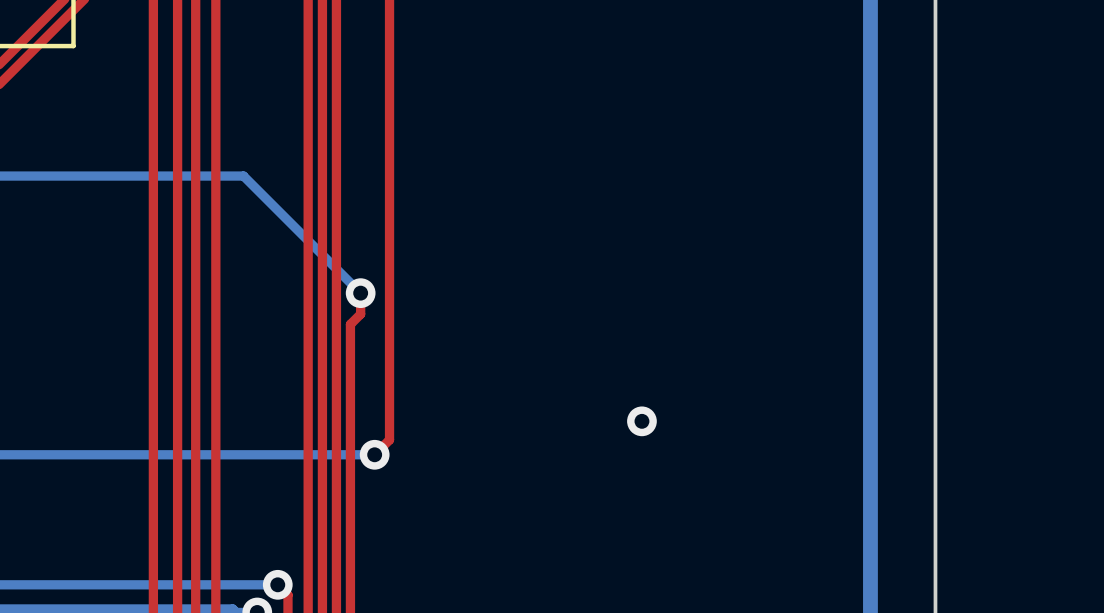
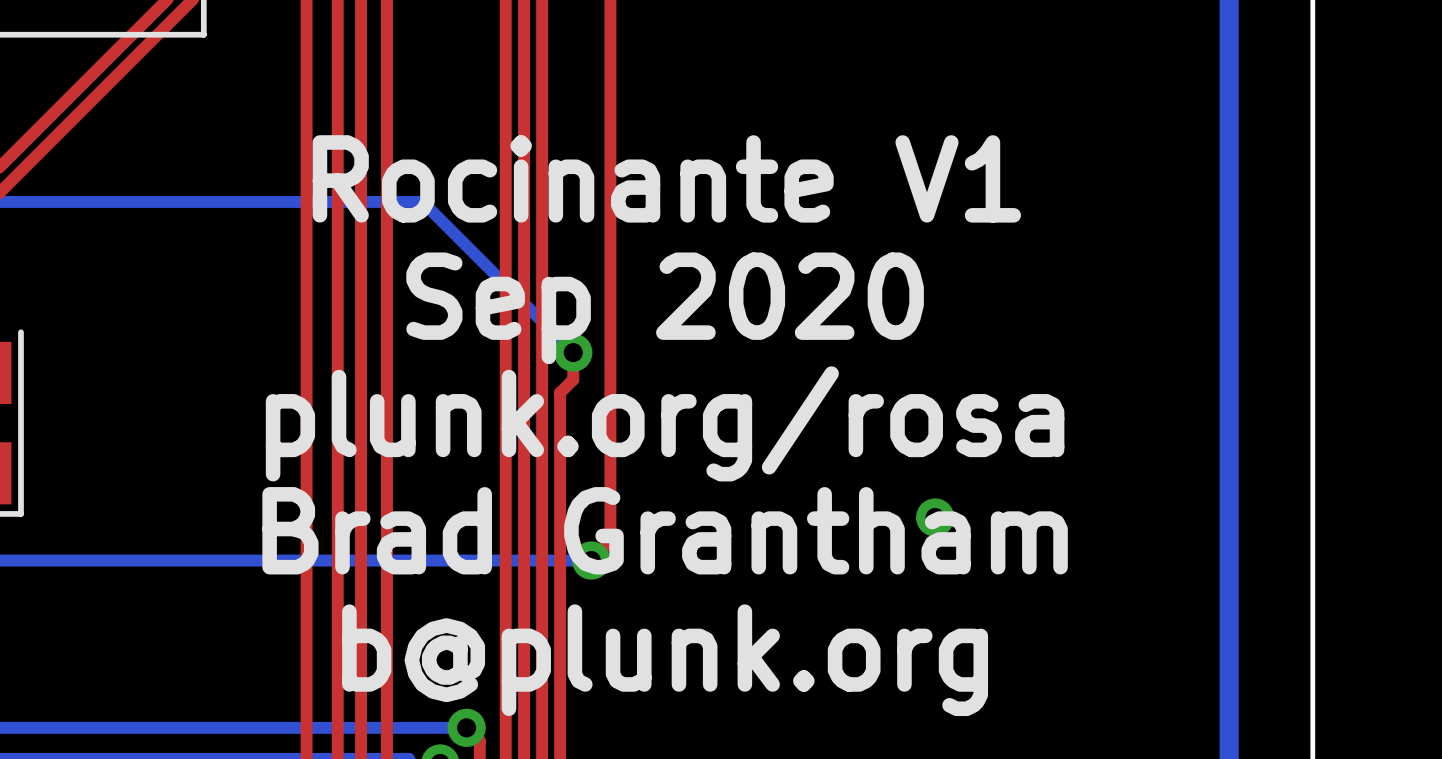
text: none -> Rocinante V1 (666, 178)
text: none -> Sep 2020 (665, 308)
text: none -> plunk.org/rosa (665, 423)
text: none -> Brad Grantham (665, 530)
text: none -> b@plunk.org (665, 660)

